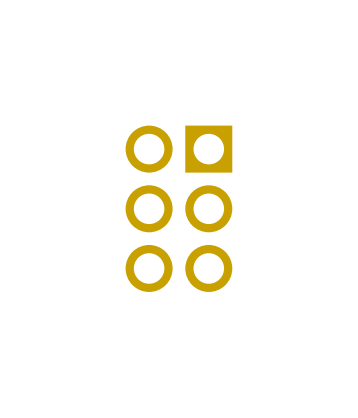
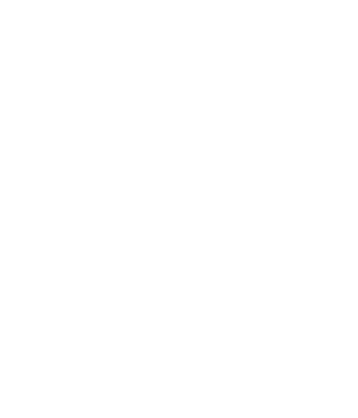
part: (178, 208) -> none

